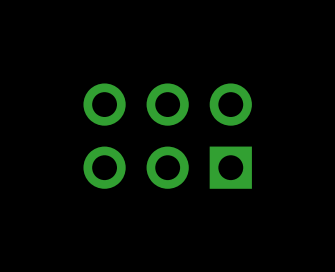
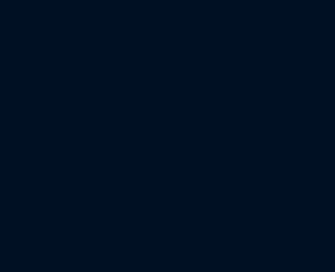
part: (167, 136) -> none

